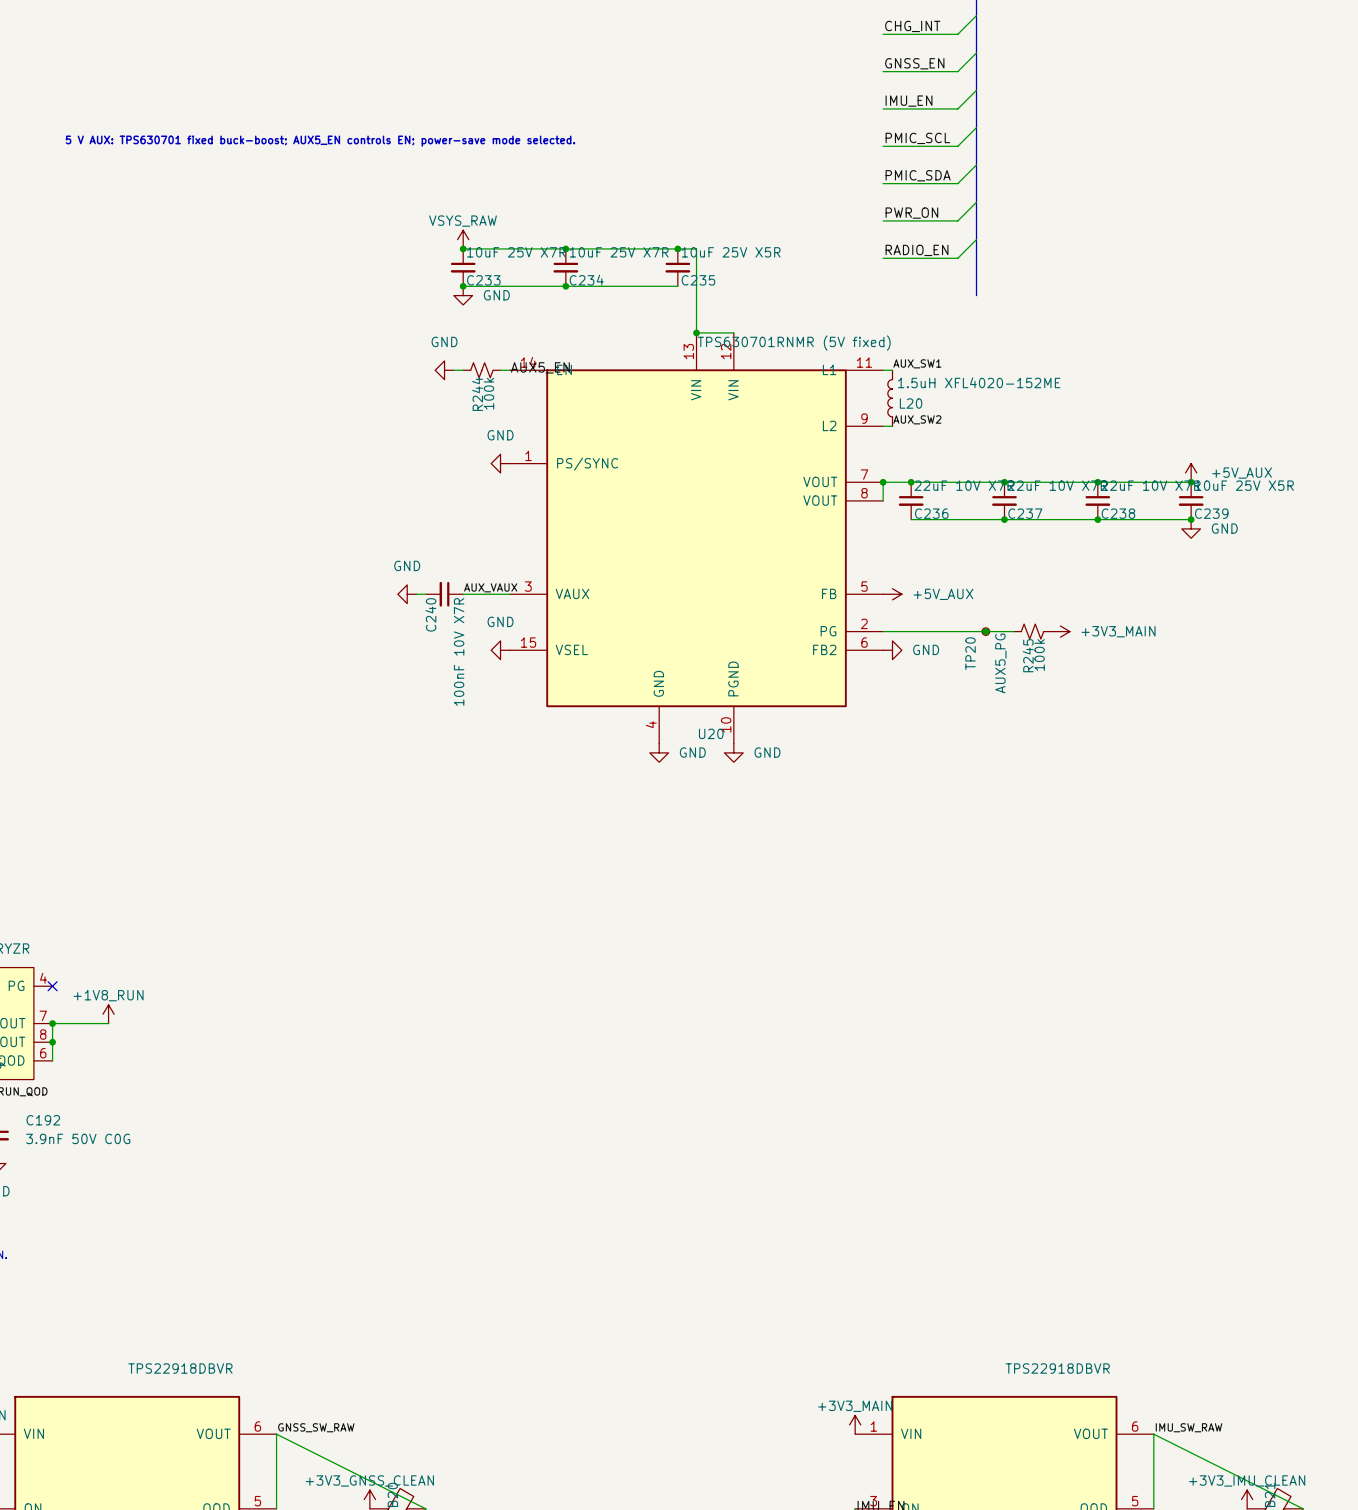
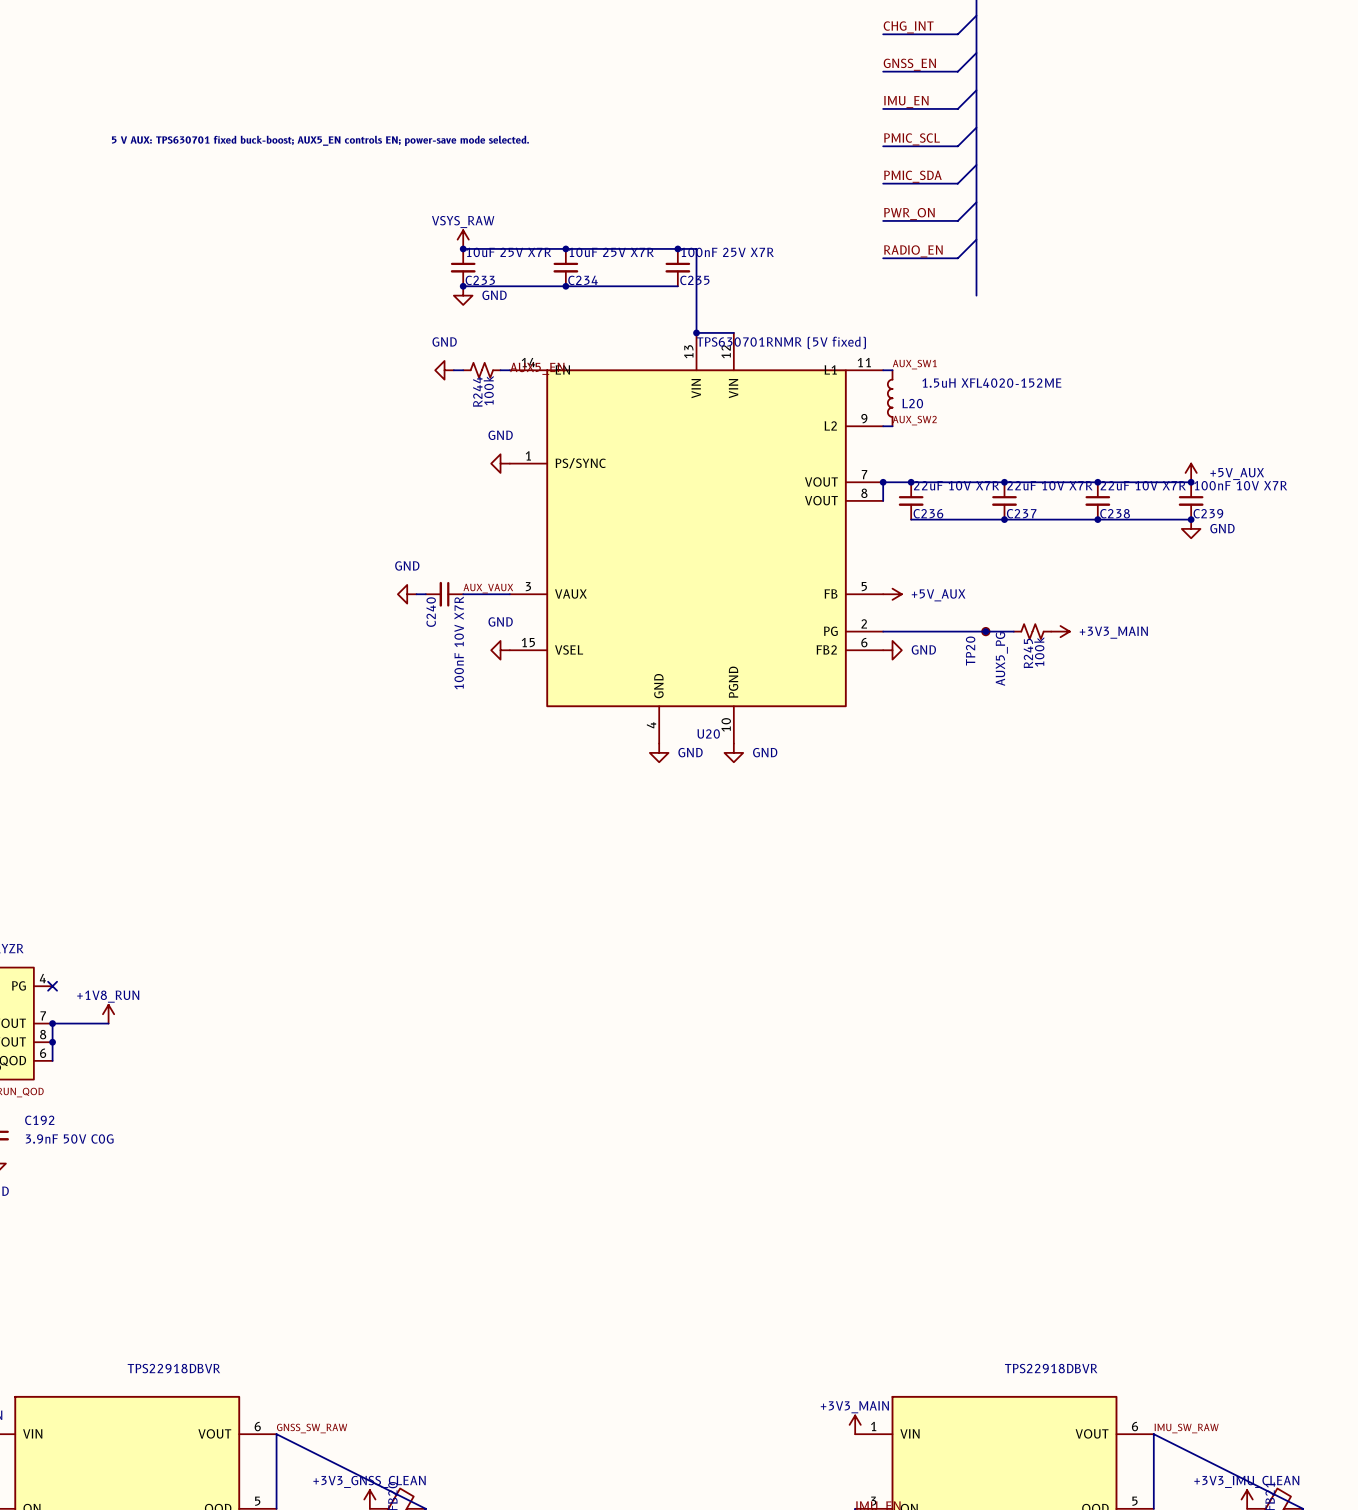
C235 value: 10uF 25V X5R (731, 252) -> 100nF 25V X7R (727, 252)
C239 value: 10uF 25V X5R (1244, 485) -> 100nF 10V X7R (1240, 485)

